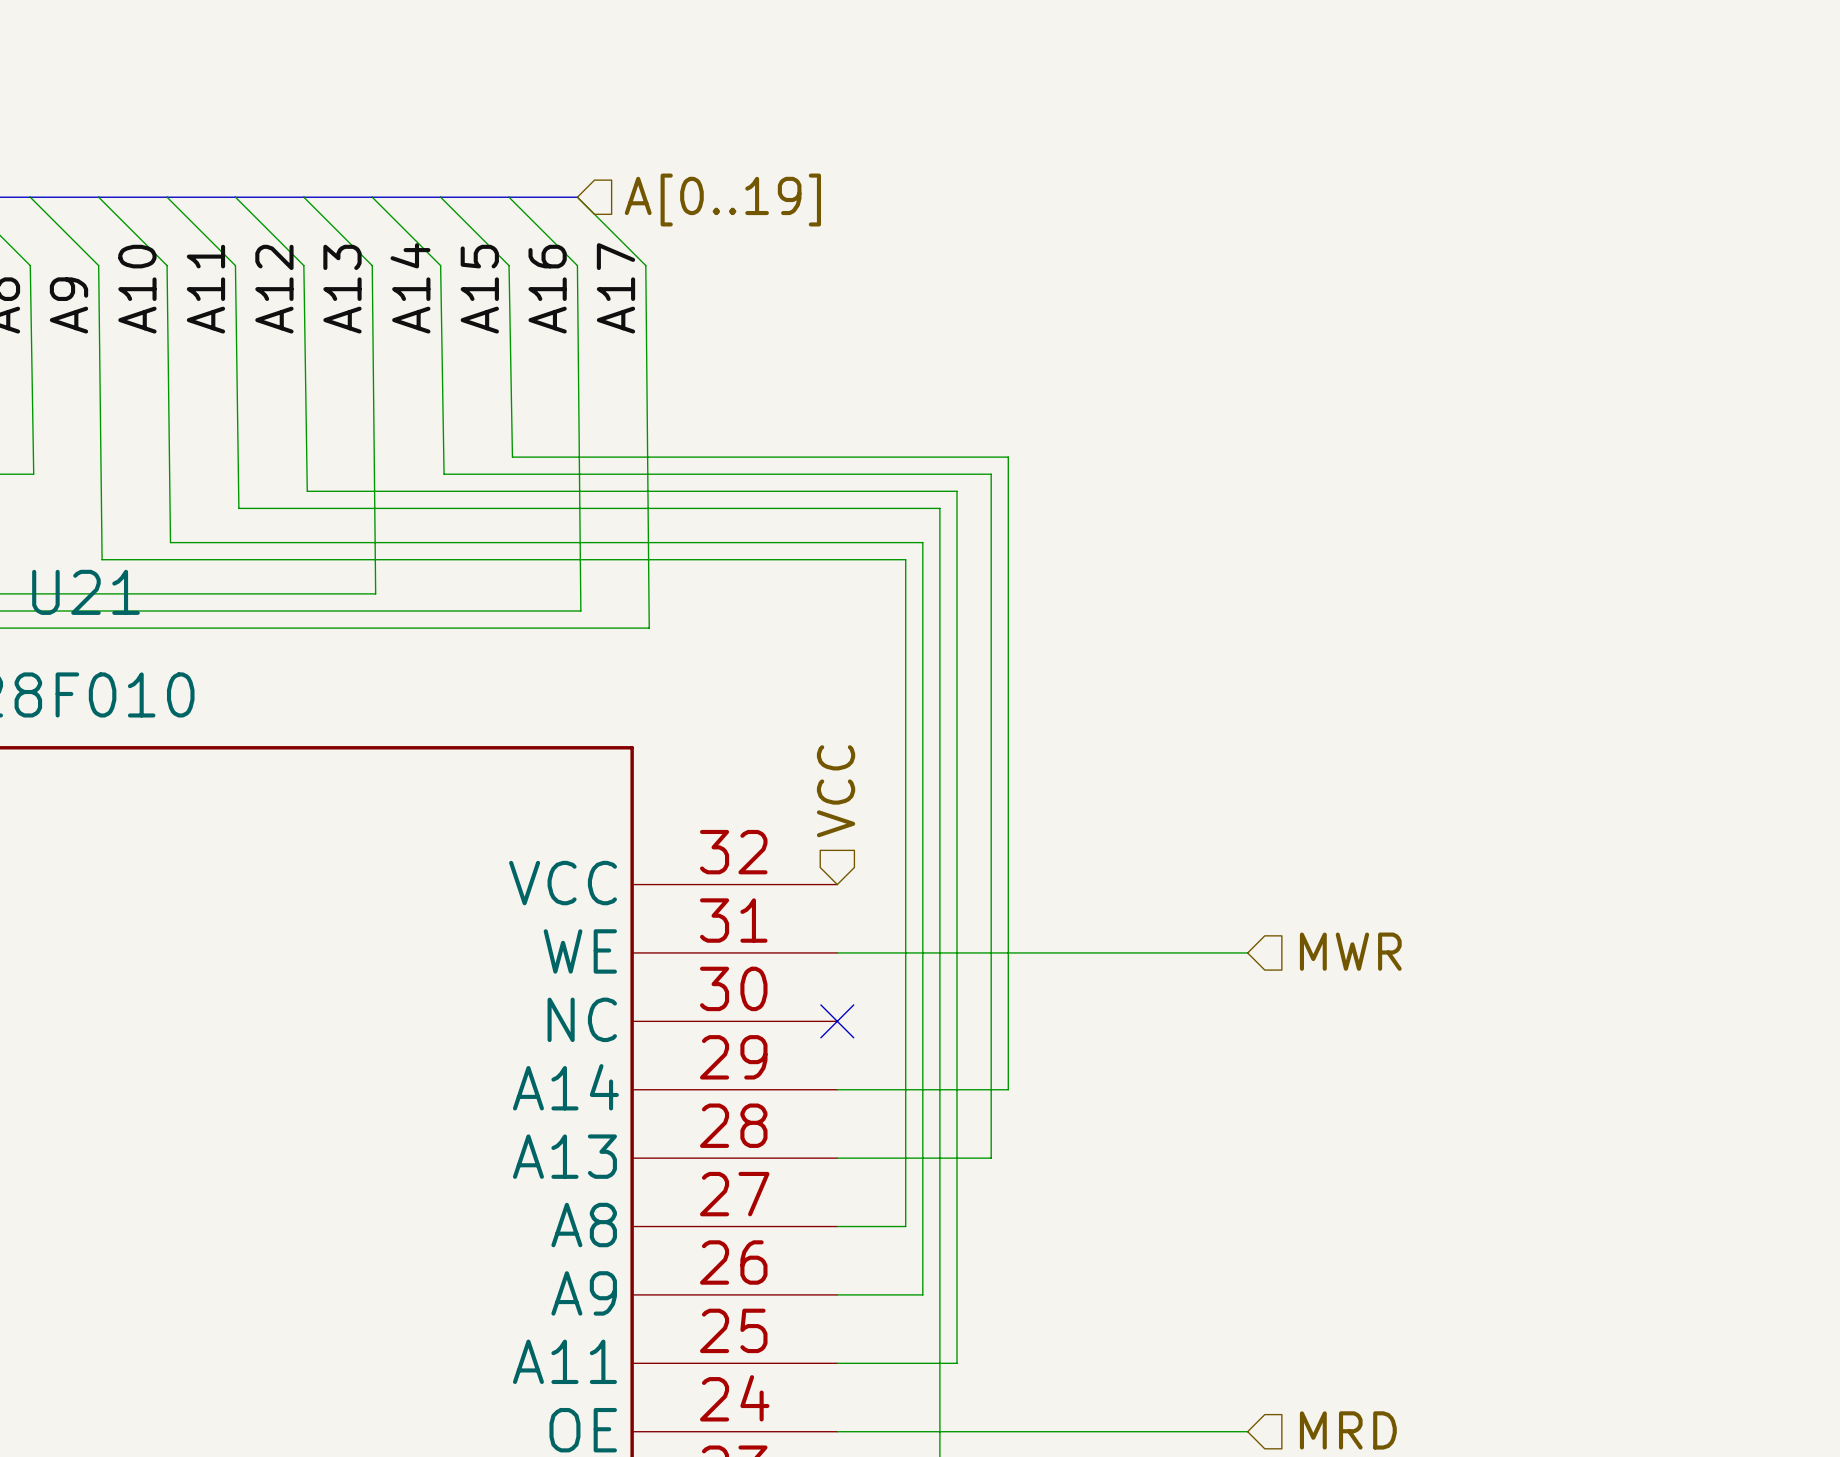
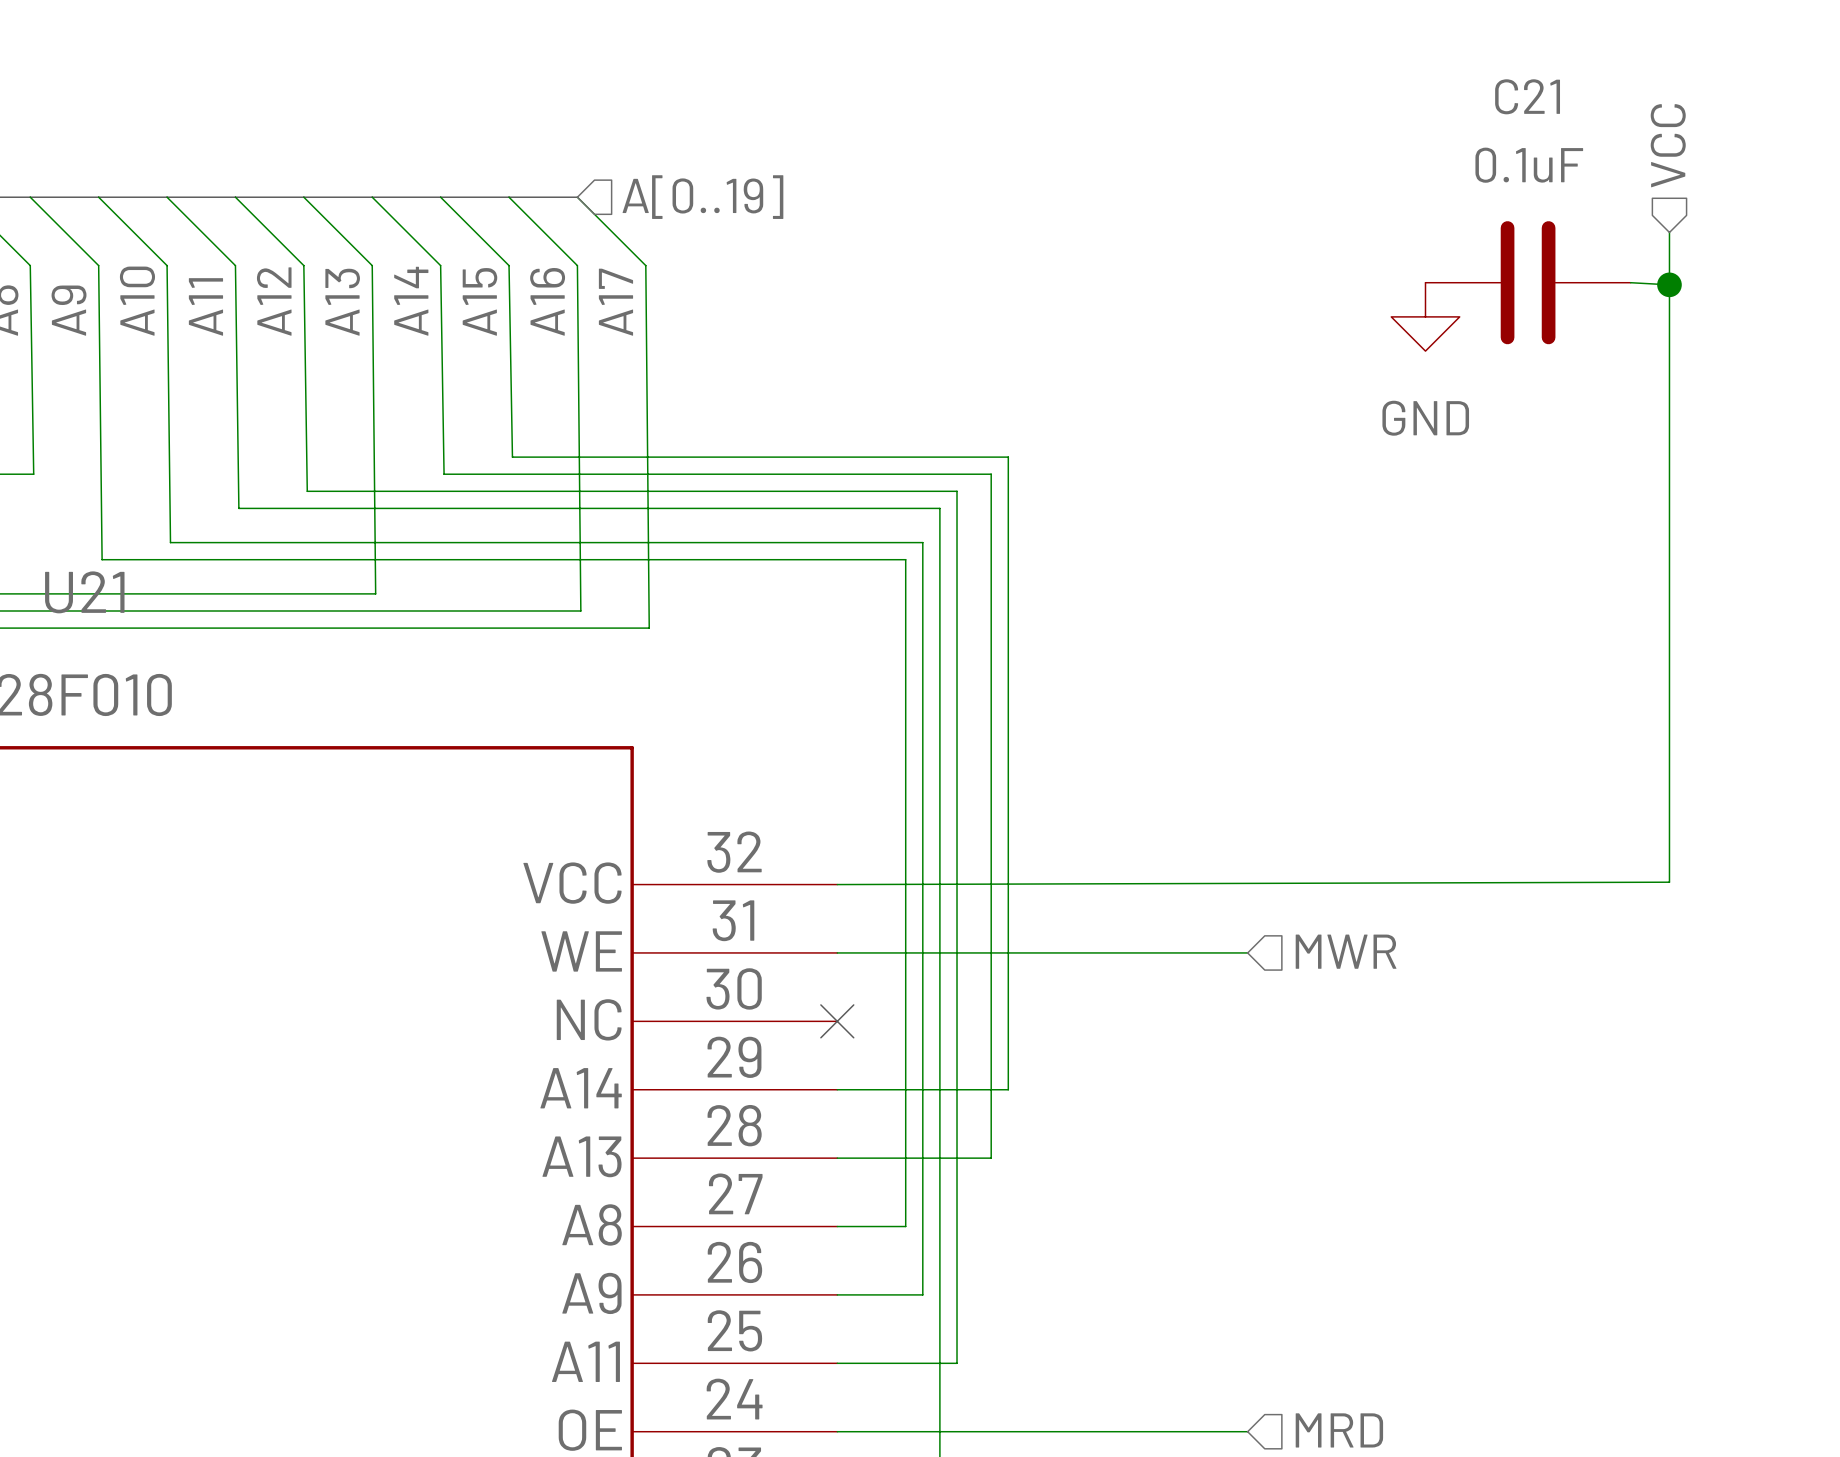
hierarchical label: none -> VCC (1668, 145)
wire: none -> (1669, 232) (1669, 882) (837, 884)
C21: none -> 0.1uF (1528, 282)
wire: none -> (1630, 282) (1669, 284)
junction: none -> (1669, 284)
power symbol: none -> GND (1425, 316)
hierarchical label: VCC (836, 791) -> none

